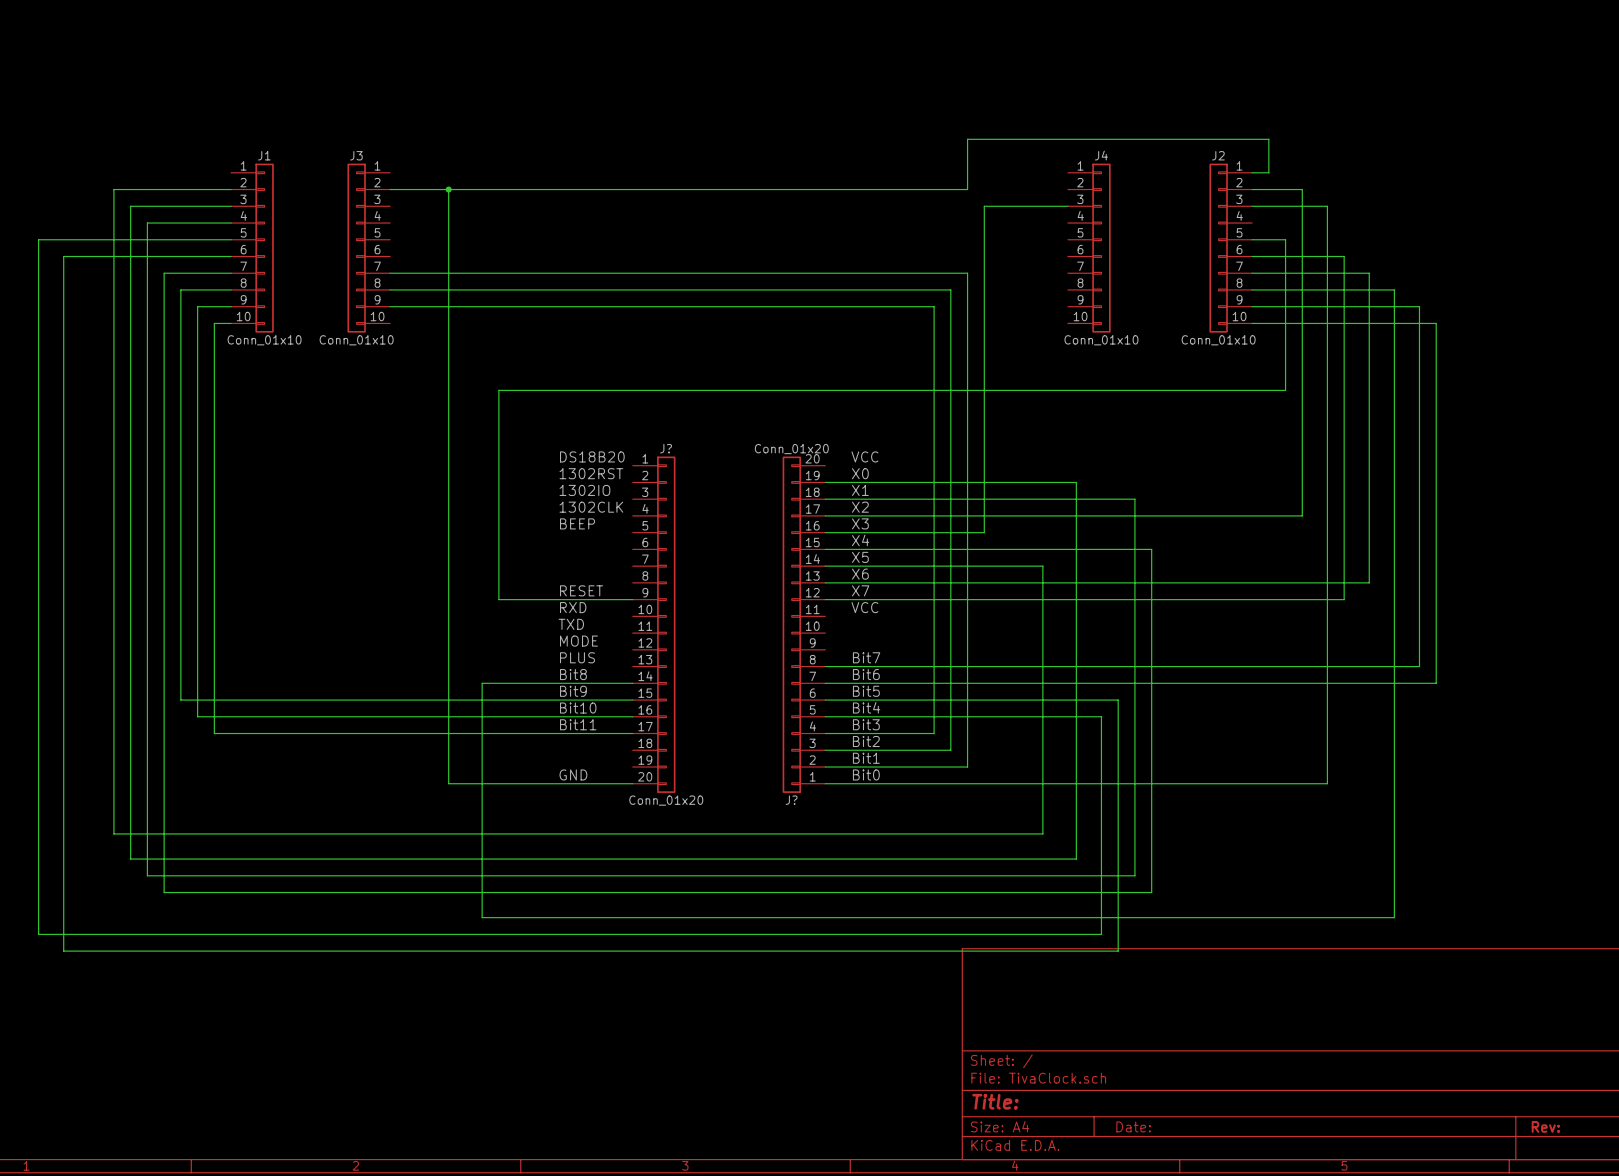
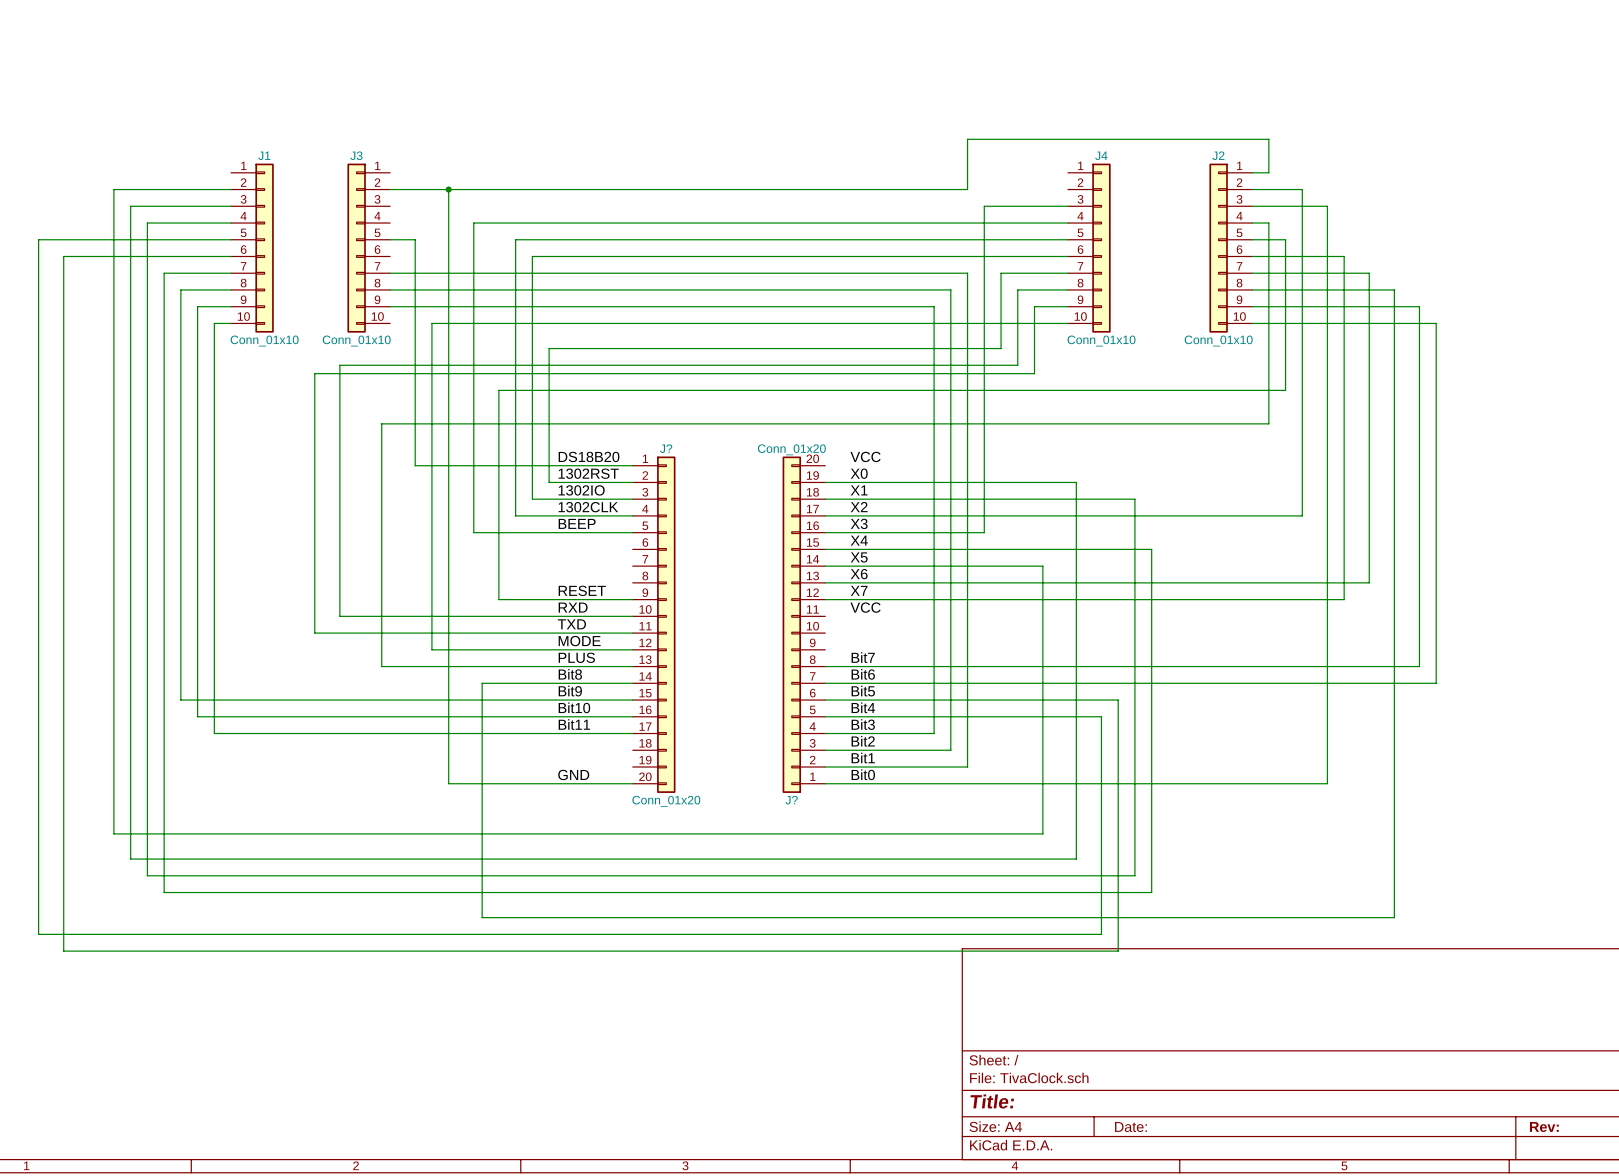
wire: none -> (1067, 223) (473, 223) (473, 532) (632, 532)
wire: none -> (1252, 223) (1268, 223) (1268, 423) (381, 423) (381, 666) (632, 666)
wire: none -> (390, 239) (415, 239) (415, 465) (632, 465)
wire: none -> (1067, 239) (515, 239) (515, 515) (632, 515)
wire: none -> (1067, 256) (532, 256) (532, 499) (632, 499)
wire: none -> (1067, 273) (1001, 273) (1001, 348) (549, 348) (549, 482) (632, 482)
wire: none -> (1067, 289) (1017, 289) (1017, 365) (339, 365) (339, 616) (632, 616)
wire: none -> (1067, 306) (1034, 306) (1034, 373) (314, 373) (314, 633) (632, 633)
wire: none -> (1067, 323) (431, 323) (431, 649) (632, 649)

